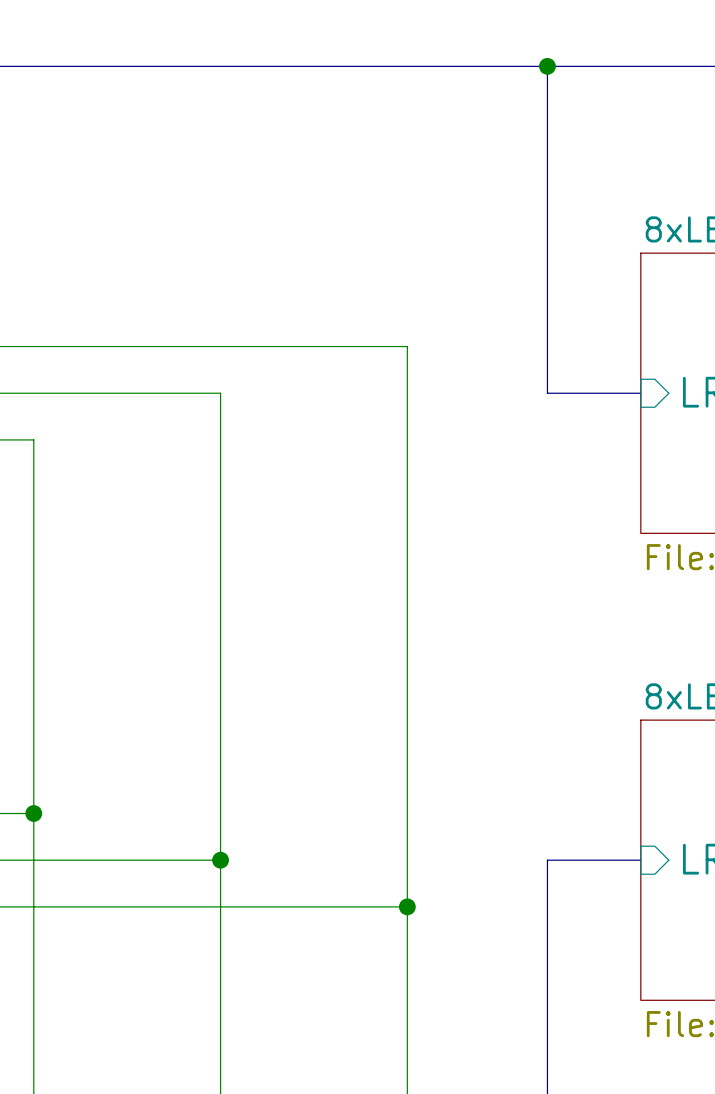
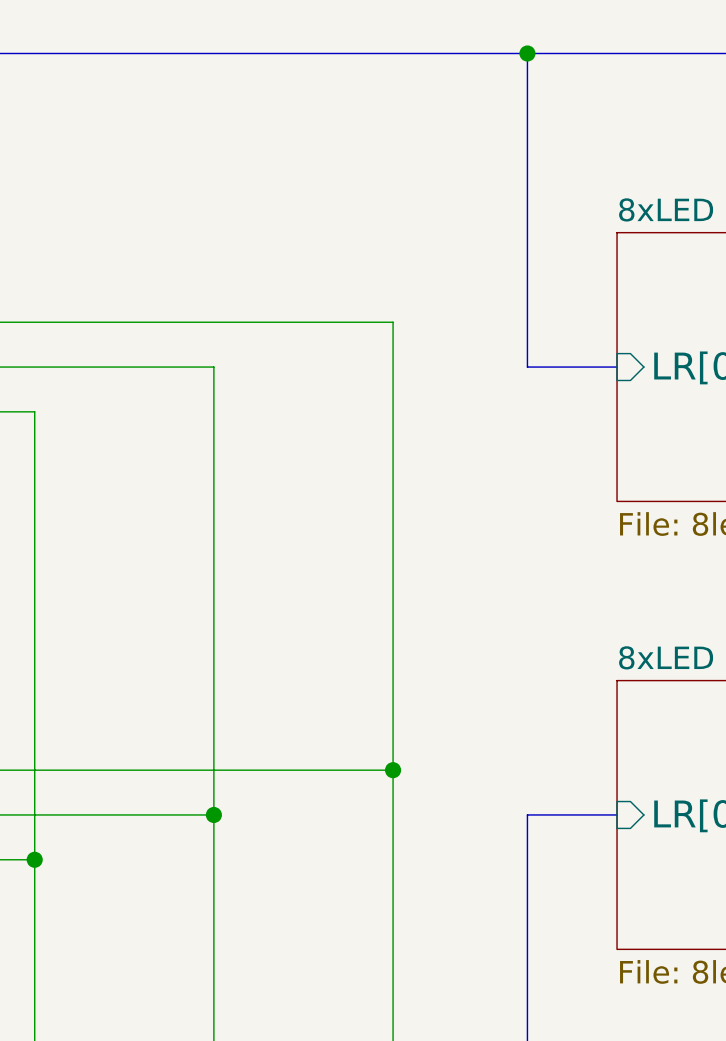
junction position: (33, 813) -> (34, 859)
wire: (33, 906) (407, 906) -> (34, 770) (393, 770)
junction position: (407, 906) -> (393, 770)

